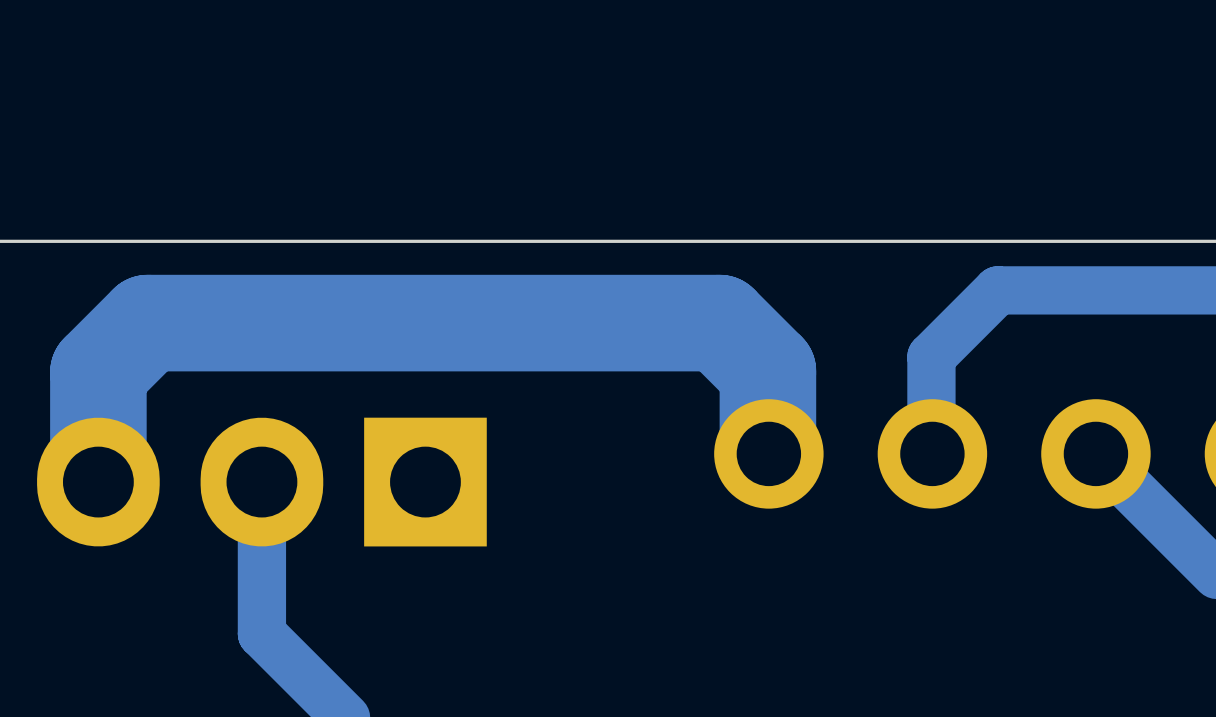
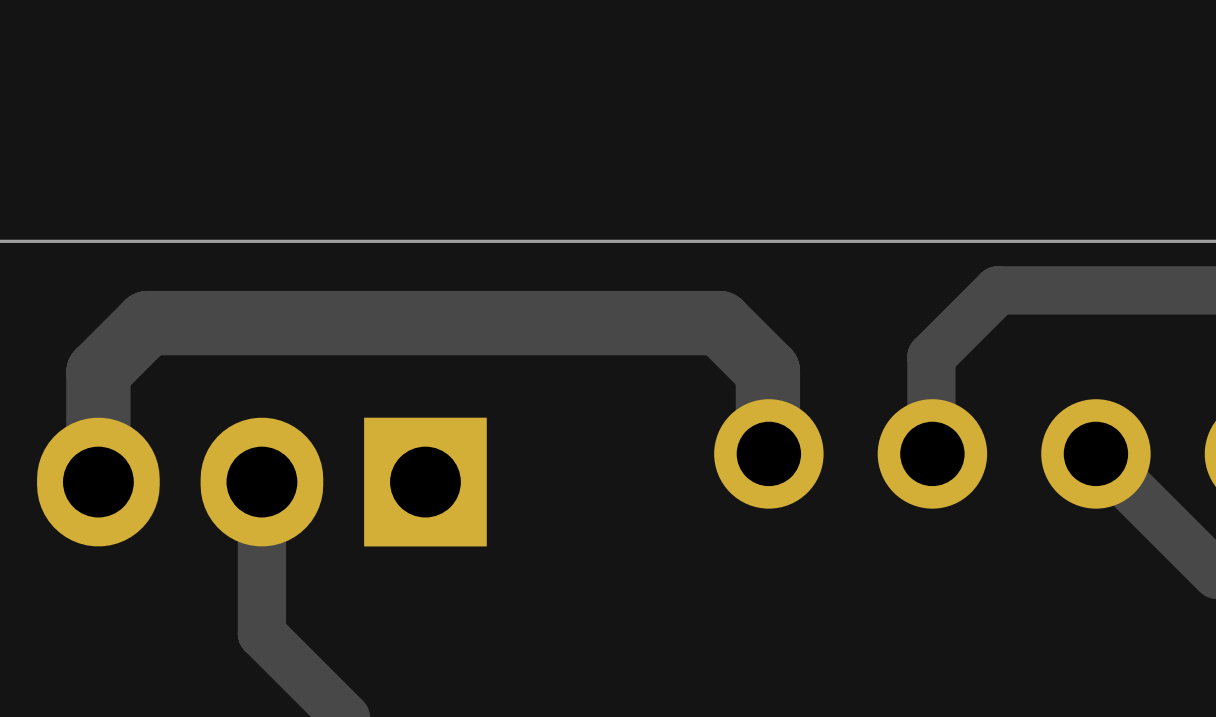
track width: thick (767, 437) (767, 371) (719, 323) (147, 323) (98, 372) (98, 482) -> thin (767, 437) (767, 371) (719, 323) (147, 323) (98, 372) (98, 482)

